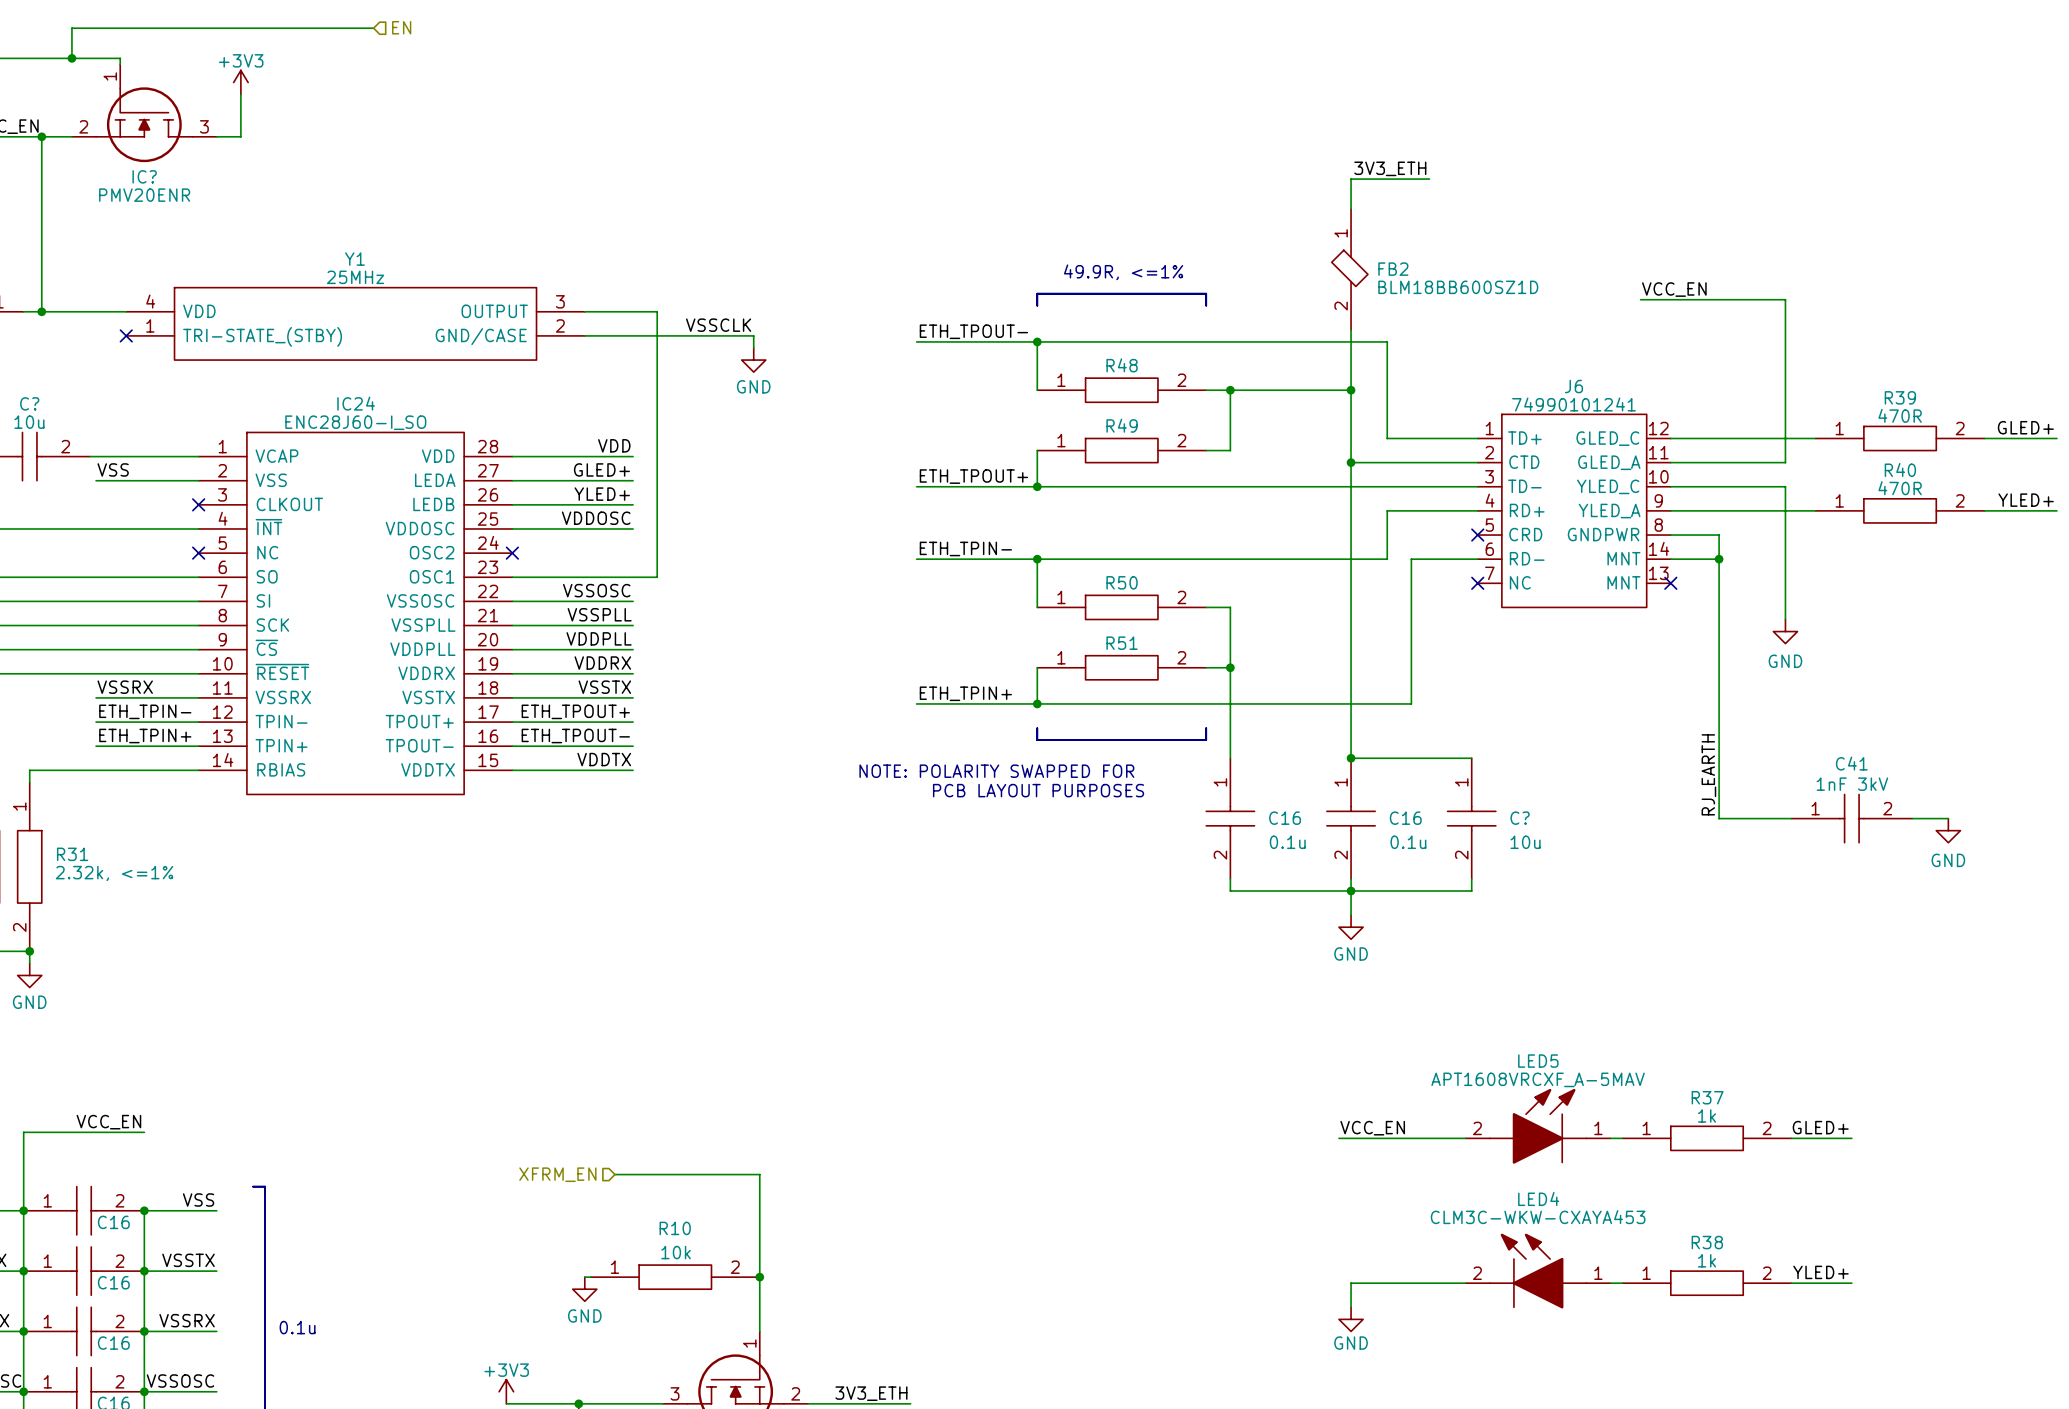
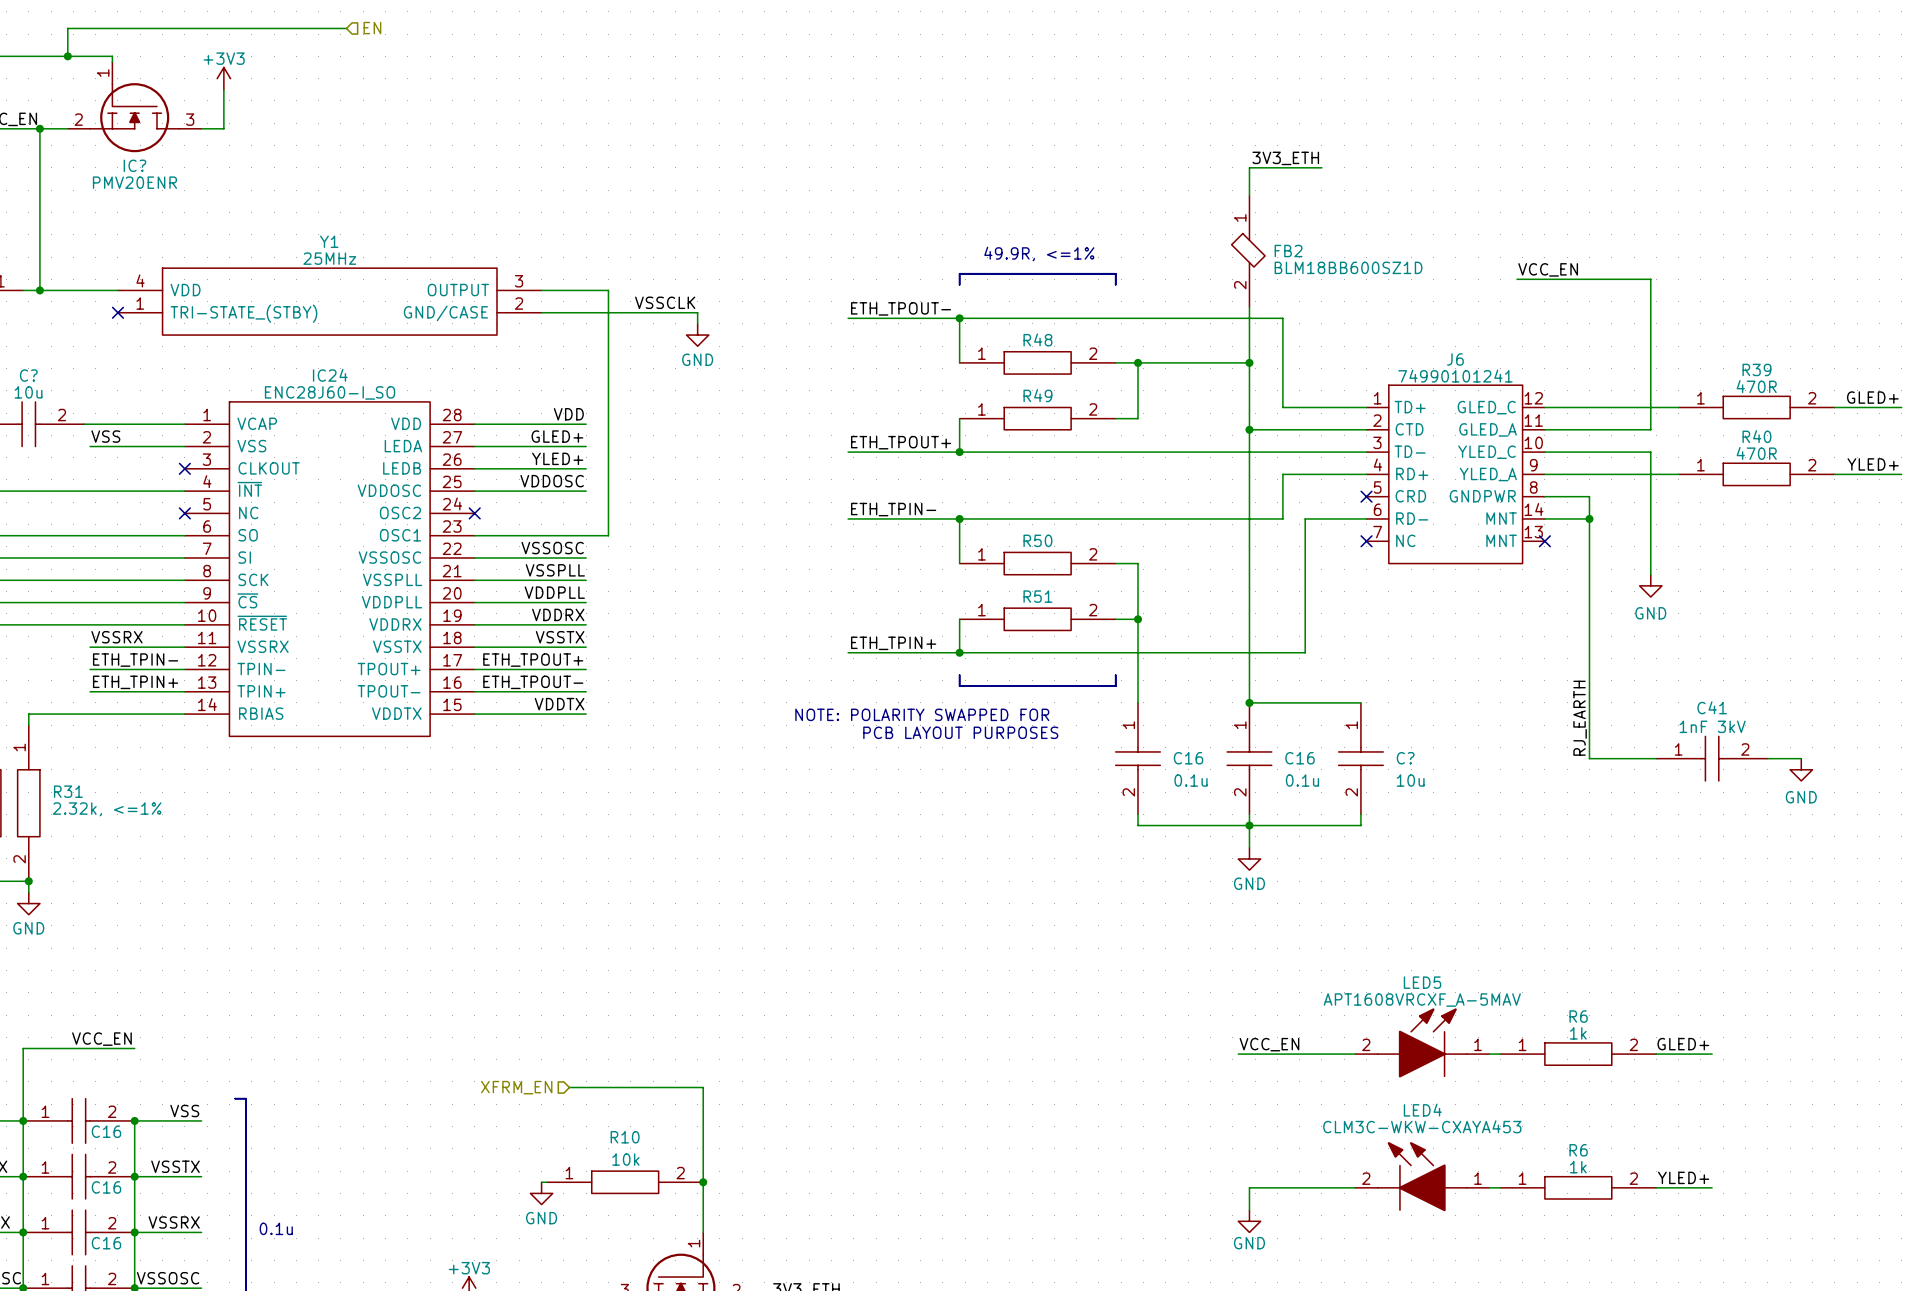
R37 name: R37 (1707, 1097) -> R6 (1578, 1016)
R38 name: R38 (1707, 1242) -> R6 (1578, 1150)

